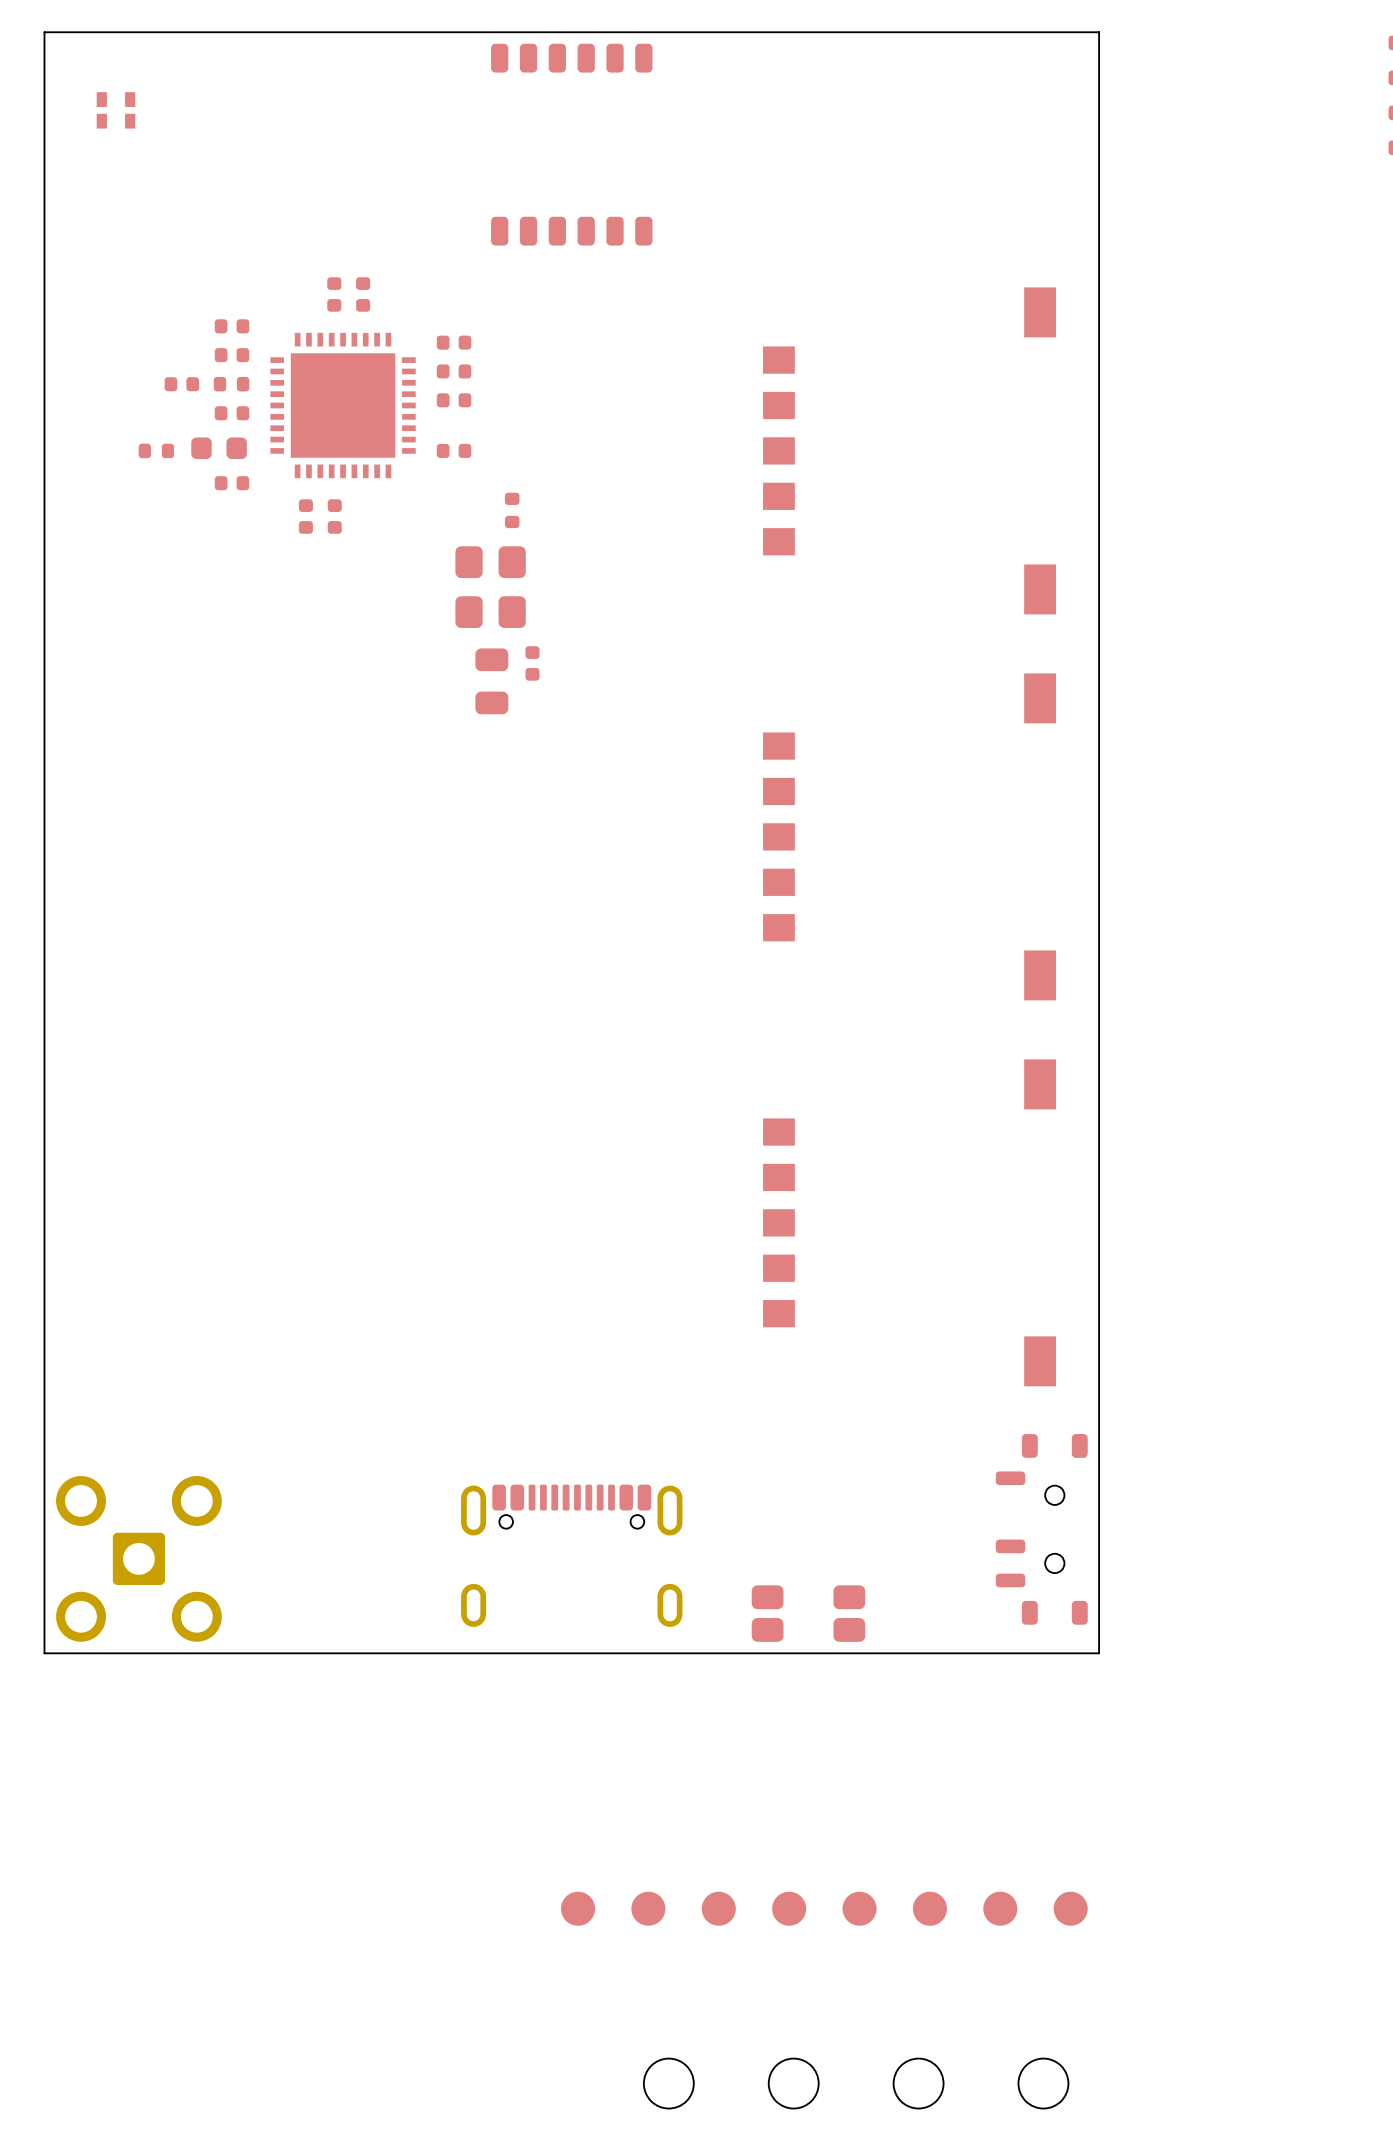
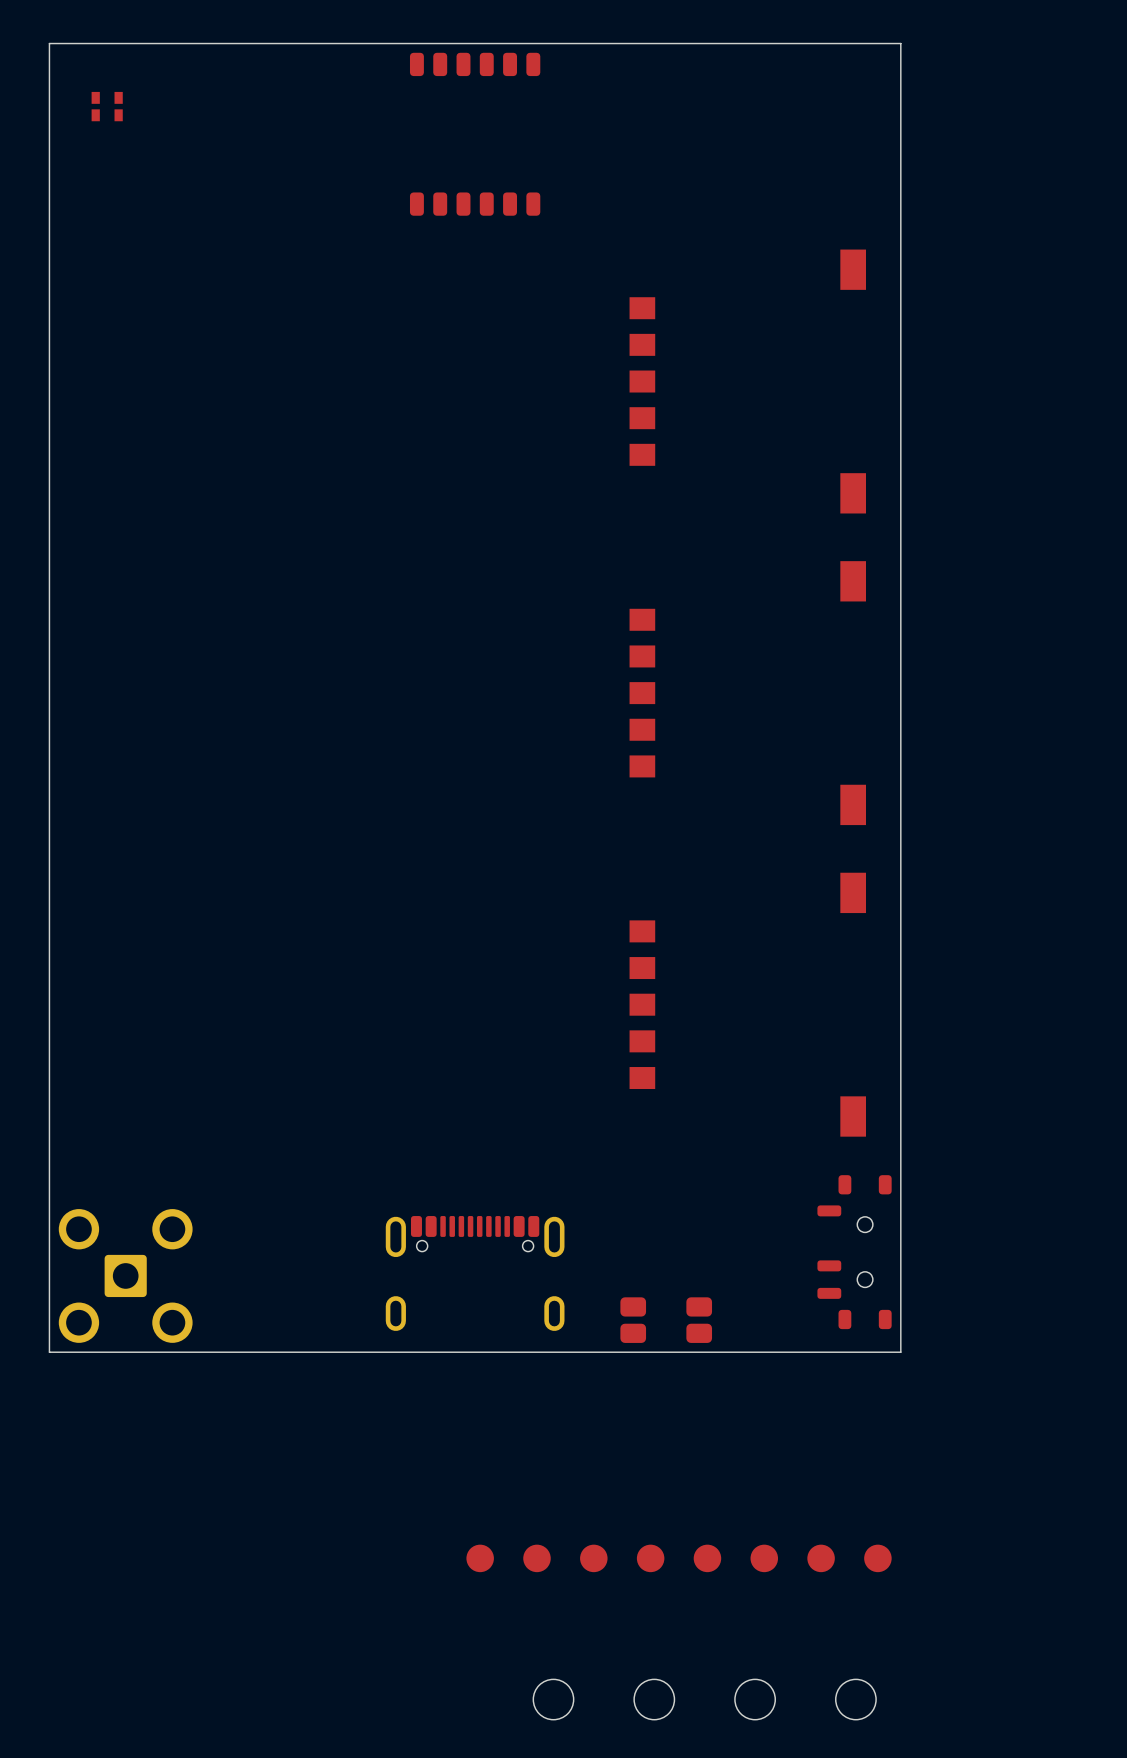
part: (334, 294) -> none
part: (363, 294) -> none
part: (232, 326) -> none
part: (454, 342) -> none
part: (232, 355) -> none
part: (454, 371) -> none
part: (181, 384) -> none
part: (231, 384) -> none
part: (454, 400) -> none
part: (343, 405) -> none
part: (232, 413) -> none
part: (219, 448) -> none
part: (156, 450) -> none
part: (454, 450) -> none
part: (232, 483) -> none
part: (512, 510) -> none
part: (305, 516) -> none
part: (334, 516) -> none
part: (490, 587) -> none
part: (532, 663) -> none
part: (491, 681) -> none

